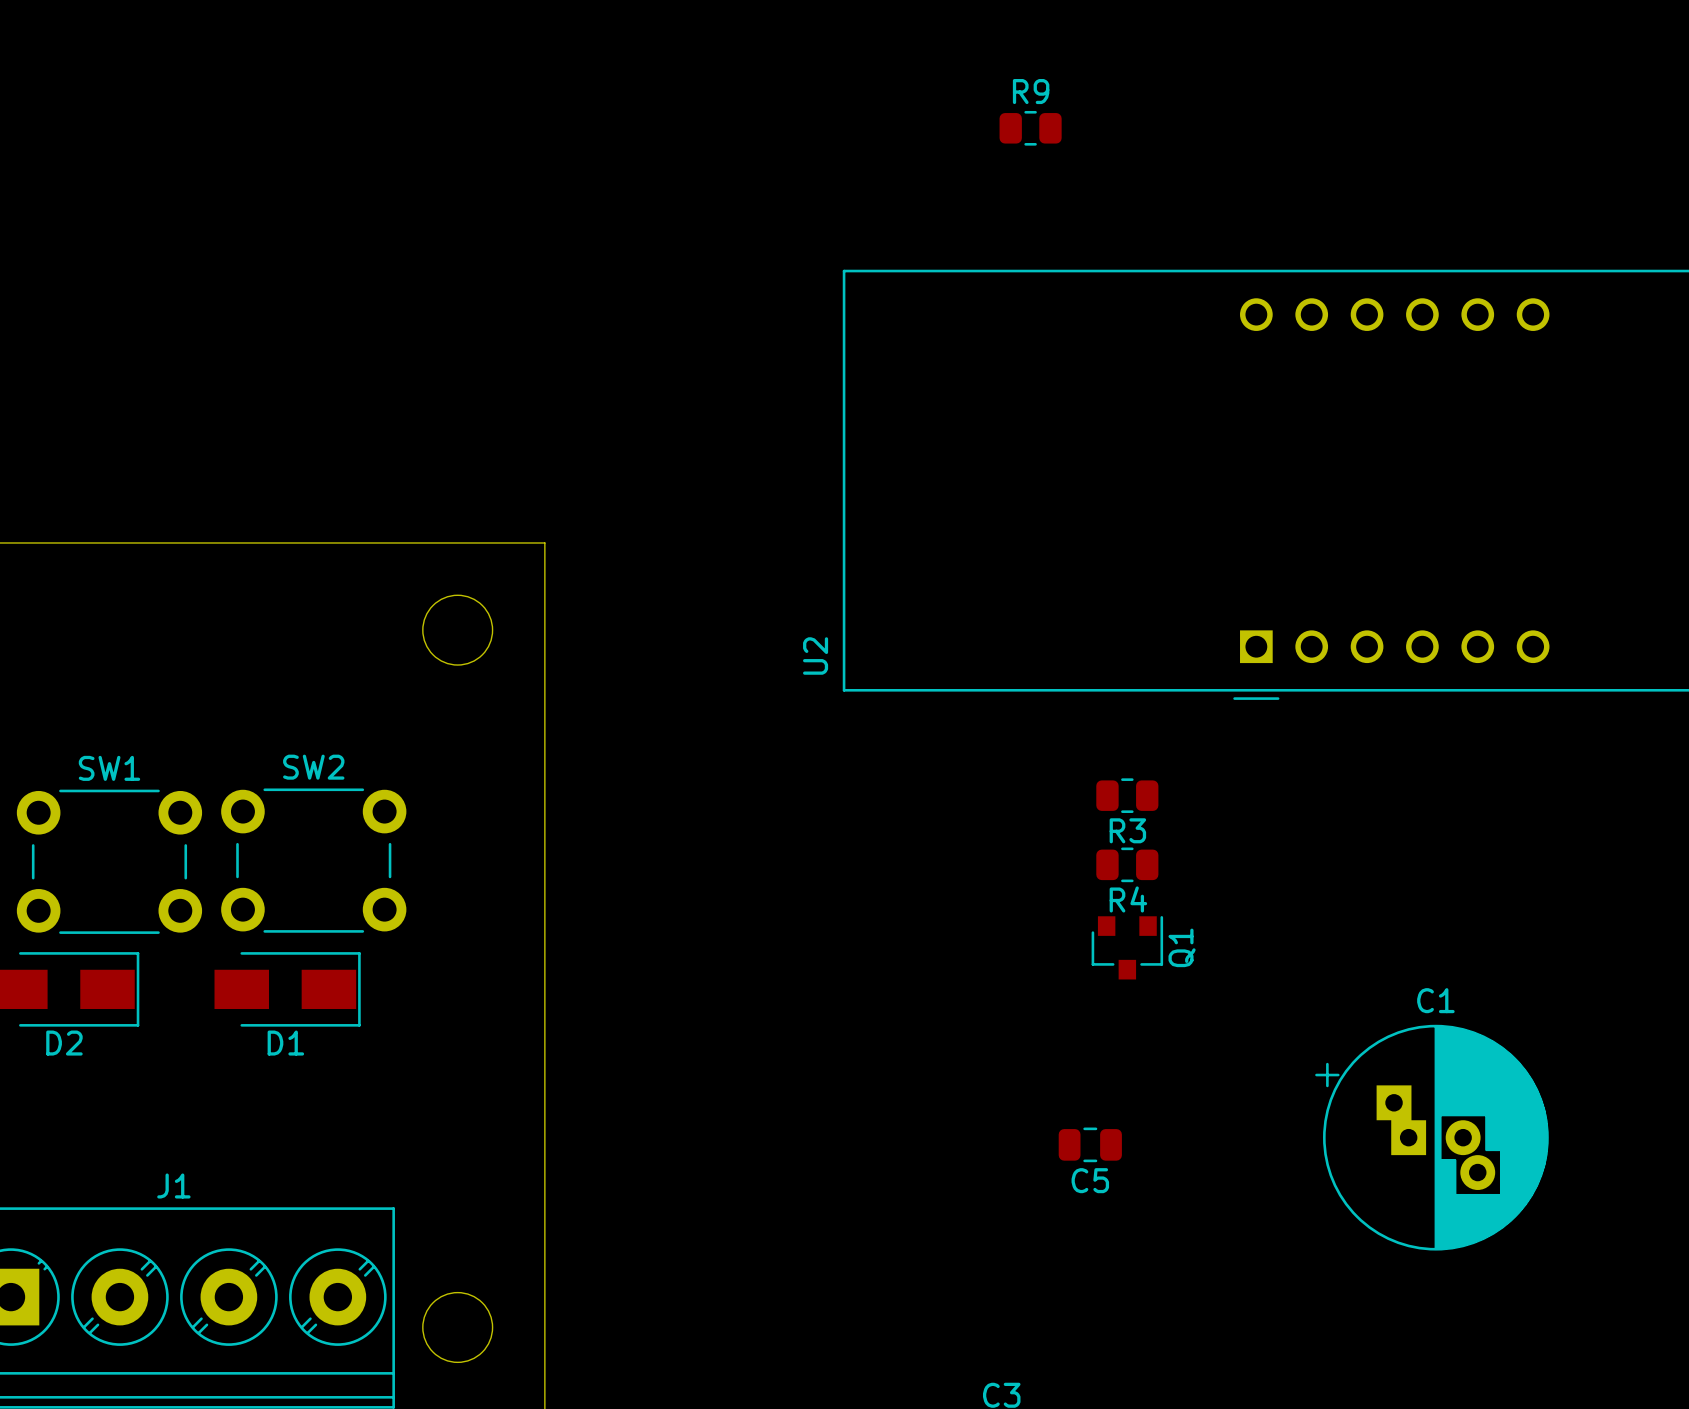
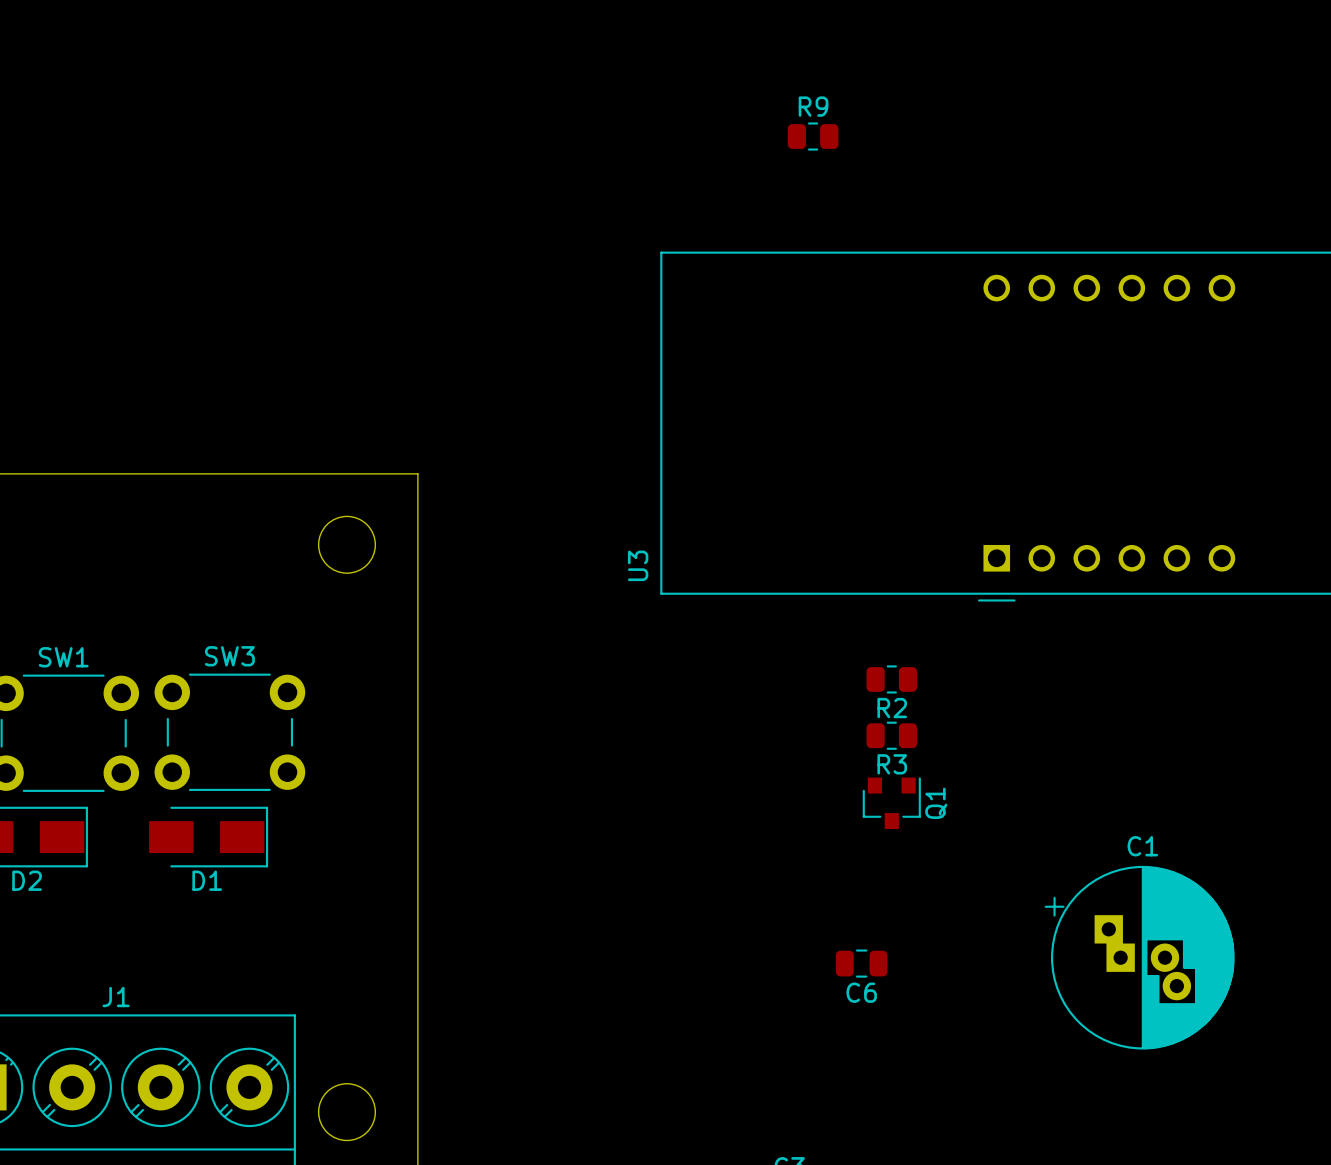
U2 name: U2 (815, 656) -> U3 (638, 565)
SW2 name: SW2 (313, 767) -> SW3 (229, 656)
R3 name: R3 (1127, 830) -> R2 (892, 708)
R4 name: R4 (1128, 899) -> R3 (892, 764)
C5 name: C5 (1090, 1180) -> C6 (861, 992)

